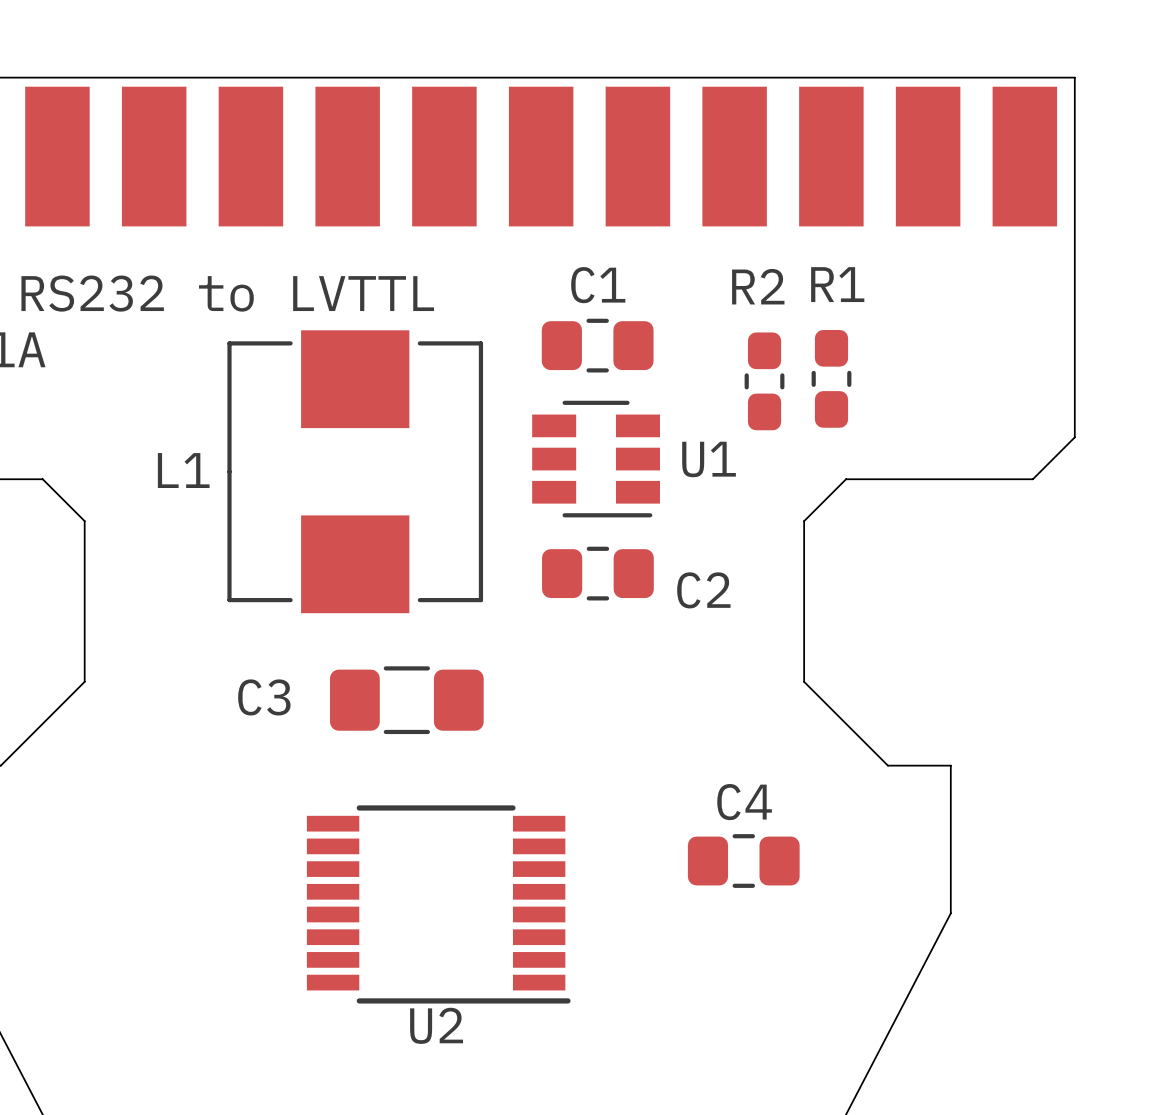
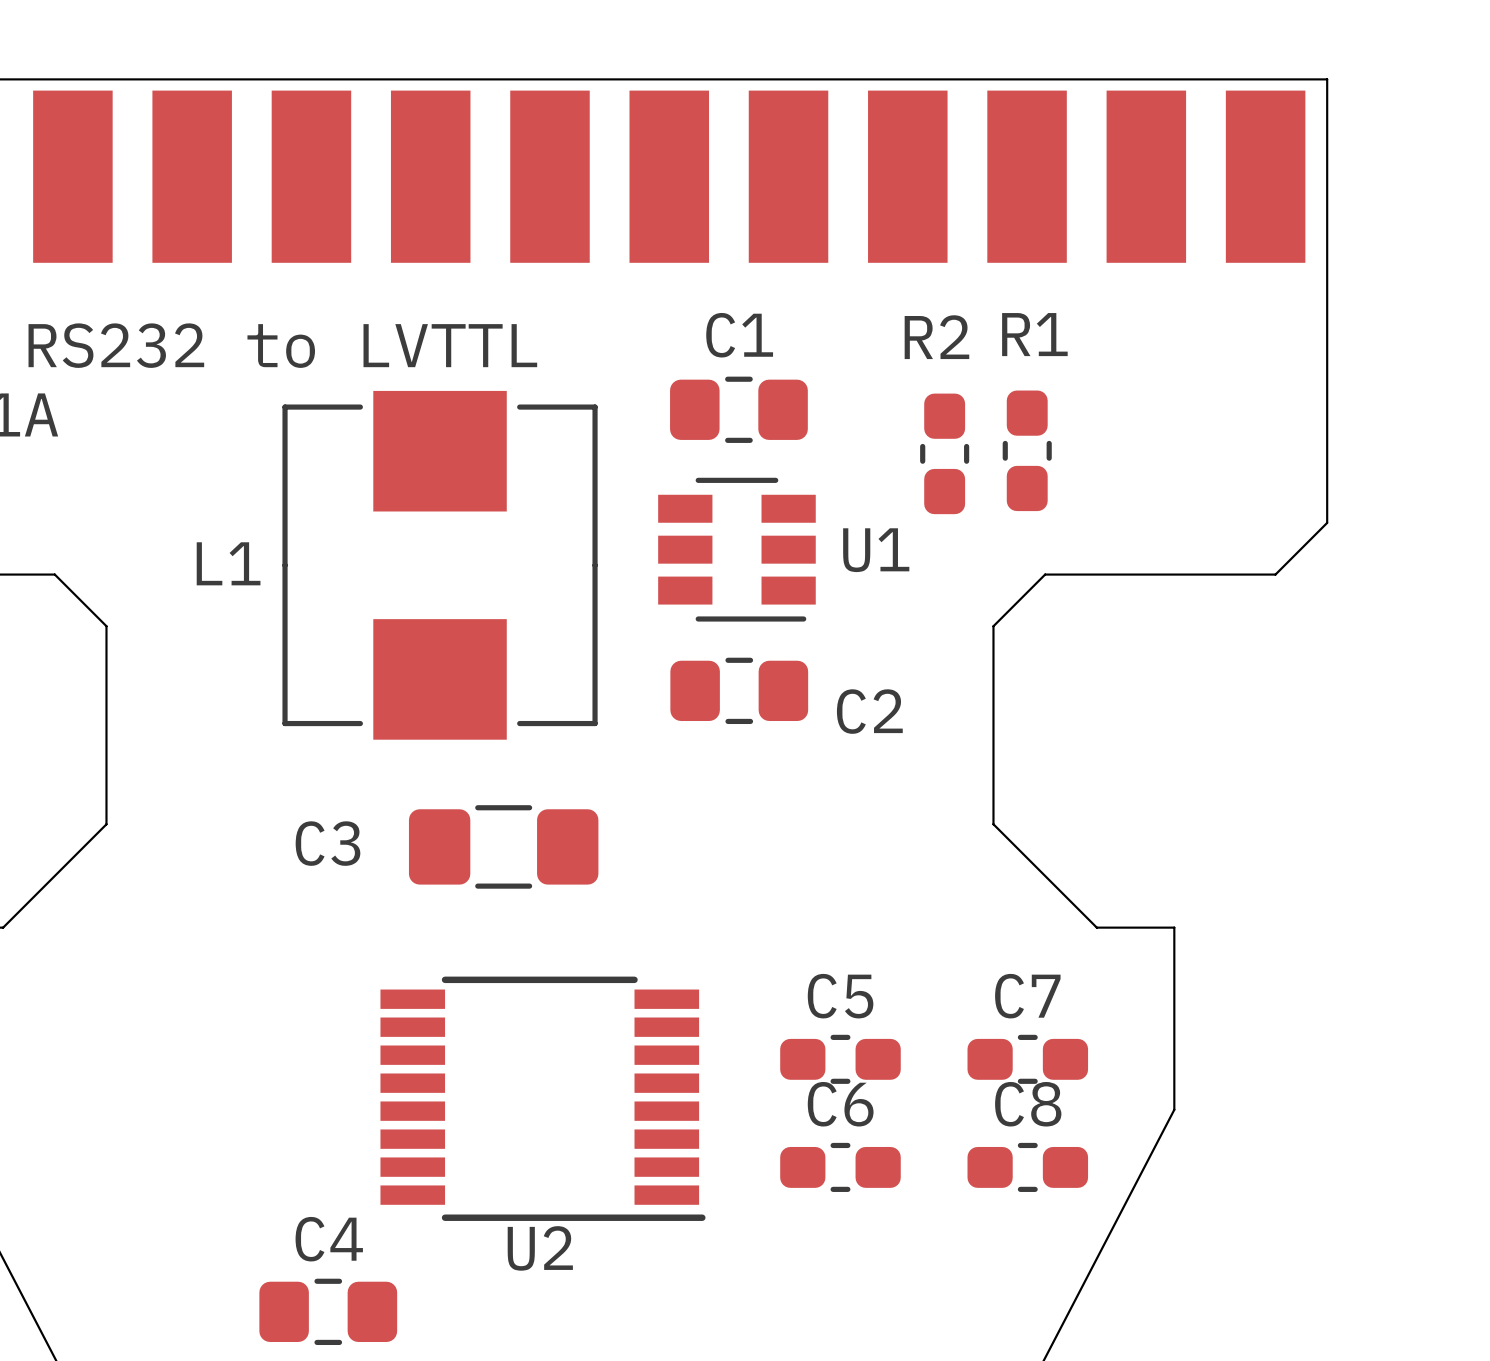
C4 position: (743, 861) -> (328, 1311)
C5: none -> (840, 1059)
C7: none -> (1027, 1059)
C6: none -> (840, 1167)
C8: none -> (1027, 1167)

